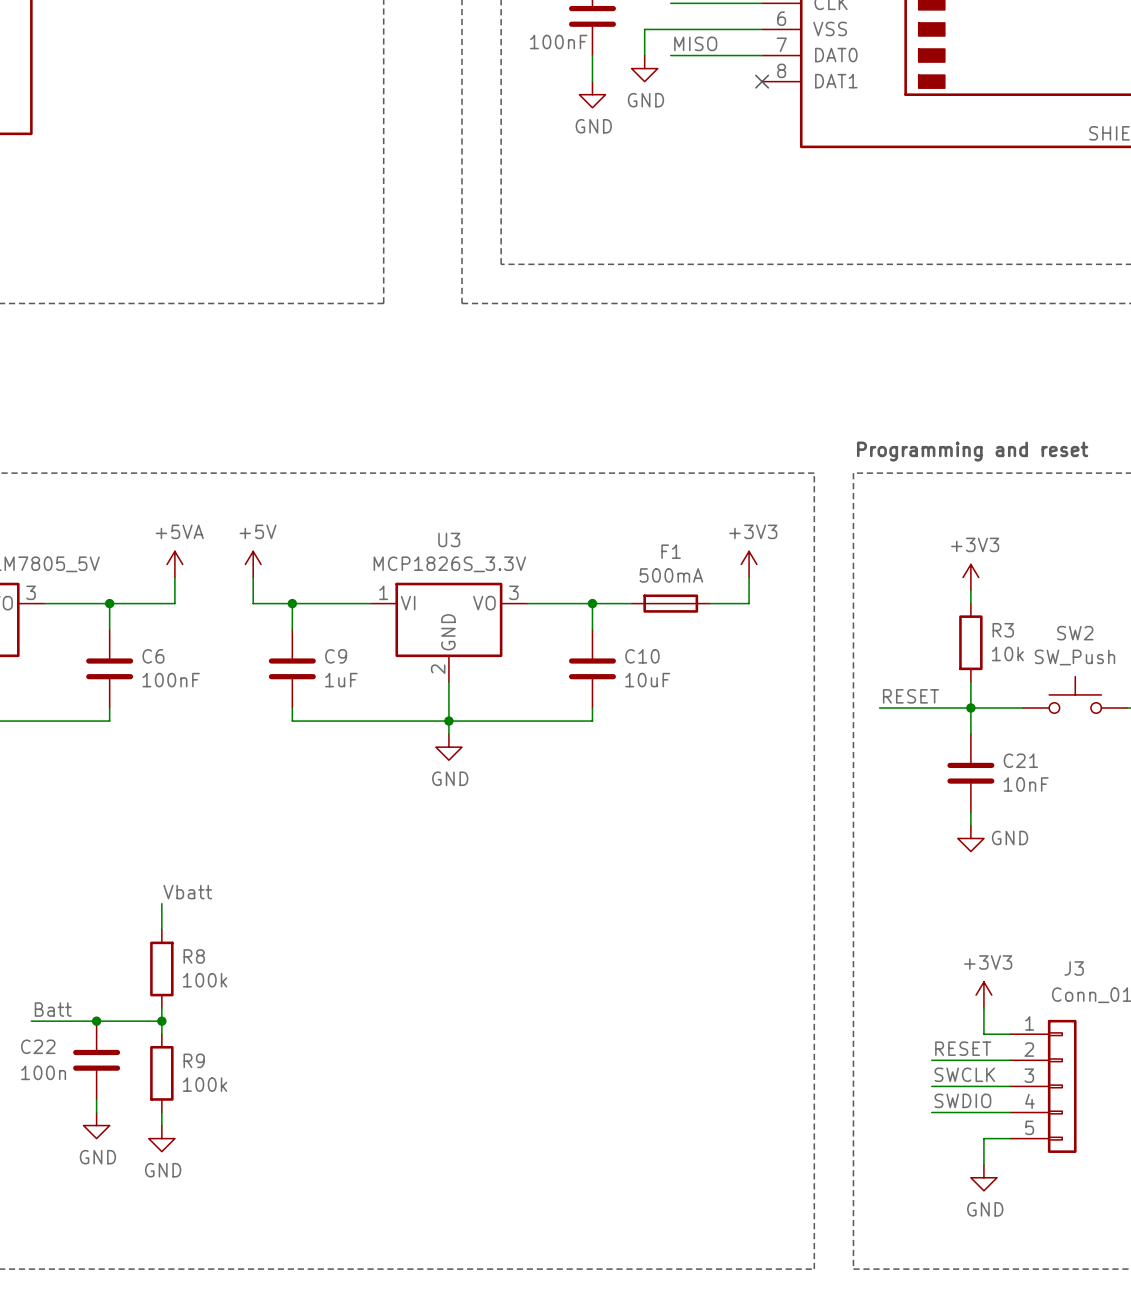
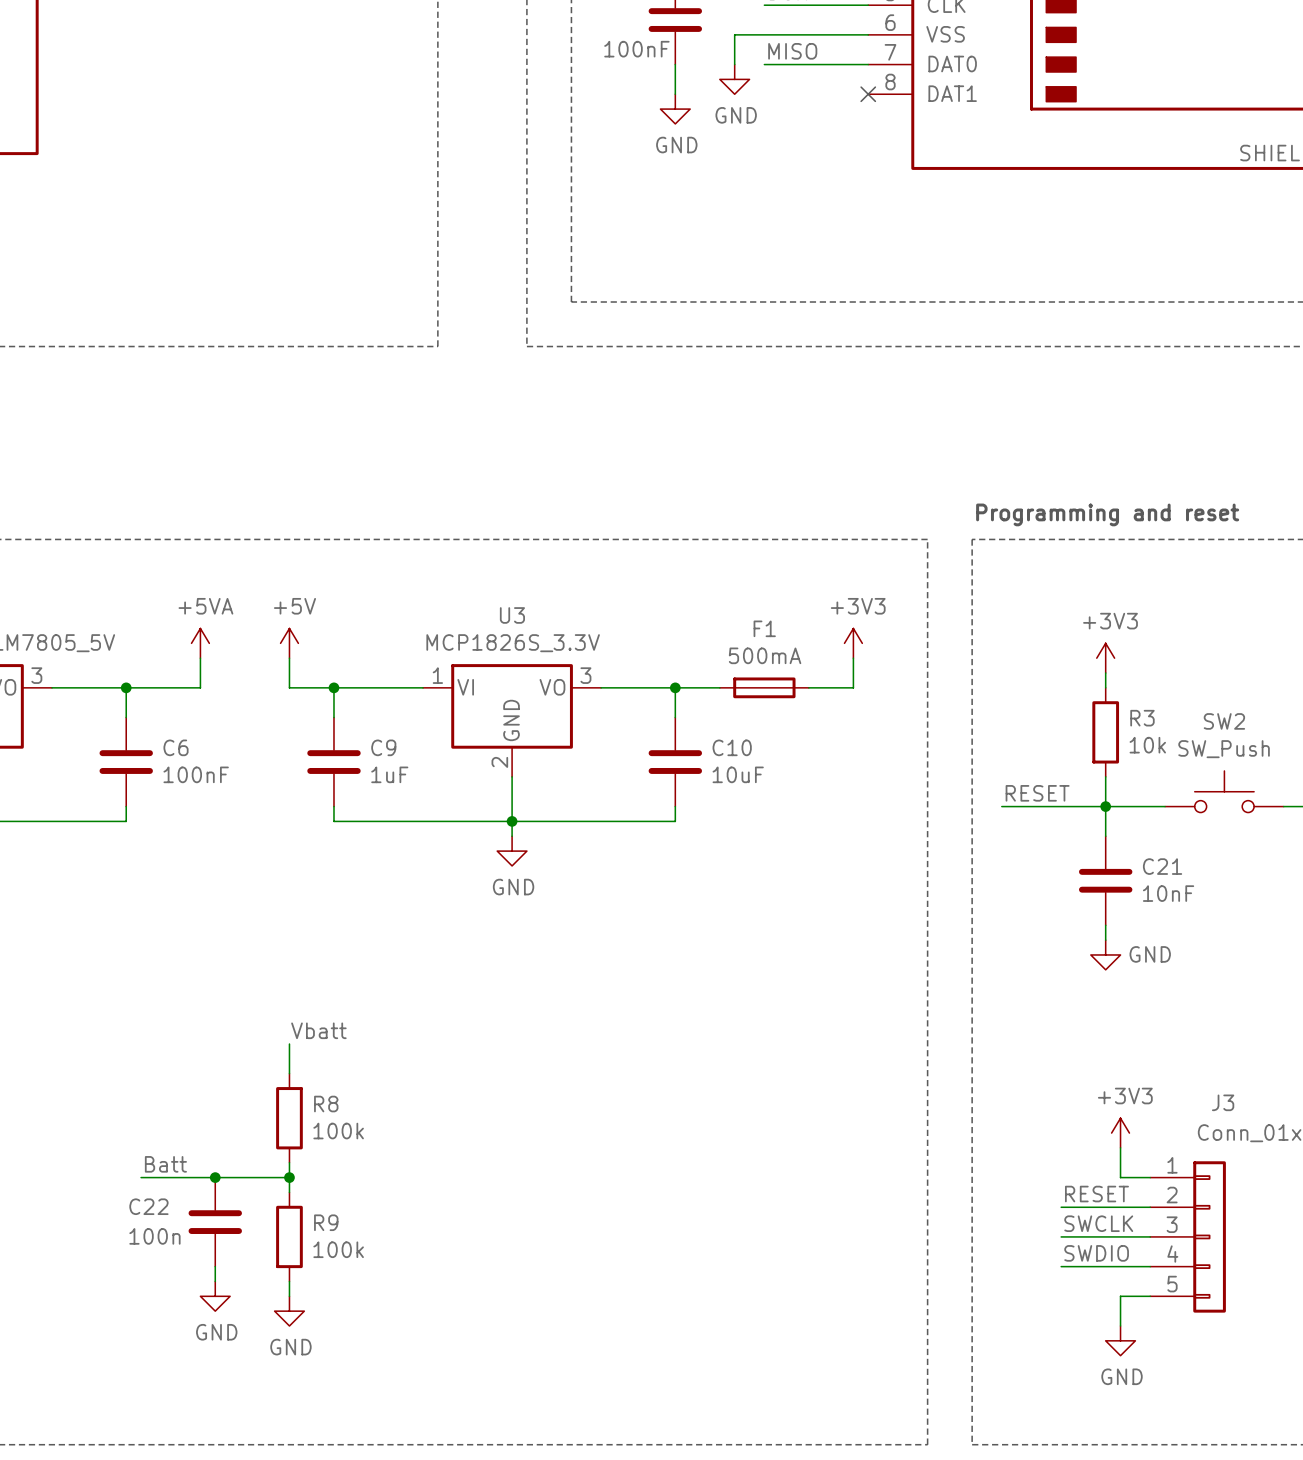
label position: Vbatt (187, 892) -> Vbatt (318, 1030)
wire: (161, 903) (161, 929) -> (289, 1044) (289, 1073)
R8 position: (161, 968) -> (289, 1118)
wire: (161, 1008) (161, 1034) -> (289, 1162) (289, 1192)
label position: Batt (53, 1009) -> Batt (165, 1164)
wire: (31, 1021) (161, 1021) -> (141, 1177) (289, 1177)
junction: (96, 1021) -> none
junction position: (161, 1021) -> (215, 1177)
junction: none -> (289, 1177)
C22 position: (96, 1060) -> (215, 1222)
R9 position: (161, 1073) -> (289, 1236)
wire: (96, 1099) (96, 1112) -> (215, 1266) (215, 1281)
wire: (161, 1112) (161, 1125) -> (289, 1281) (289, 1296)
power symbol: GND (96, 1125) -> none
power symbol position: GND (161, 1138) -> GND (215, 1296)
power symbol: none -> GND (289, 1311)

